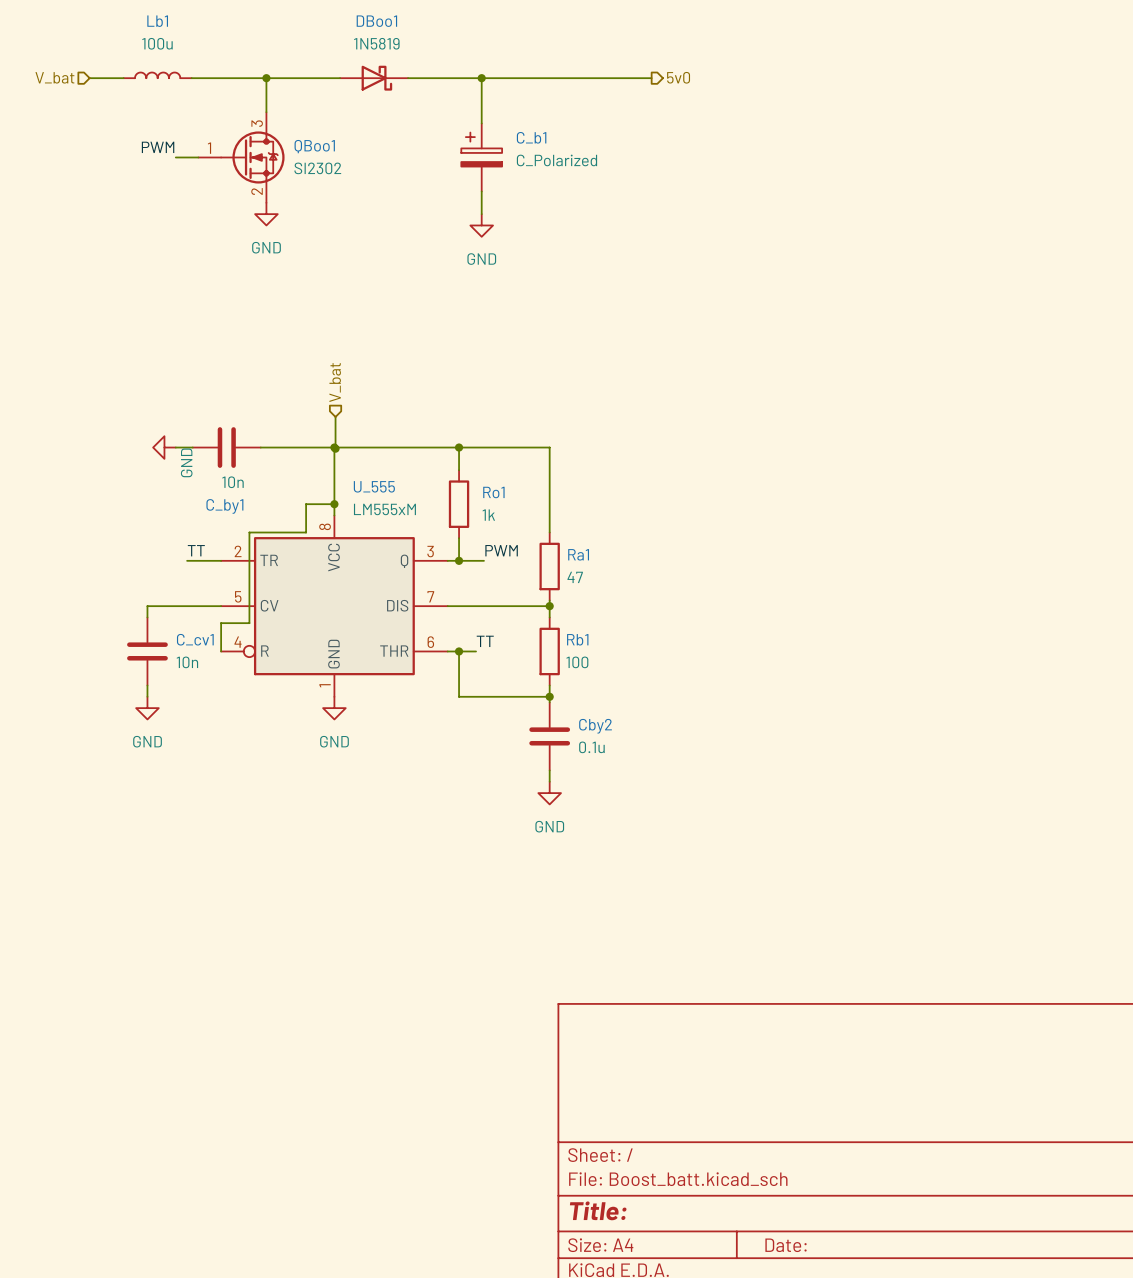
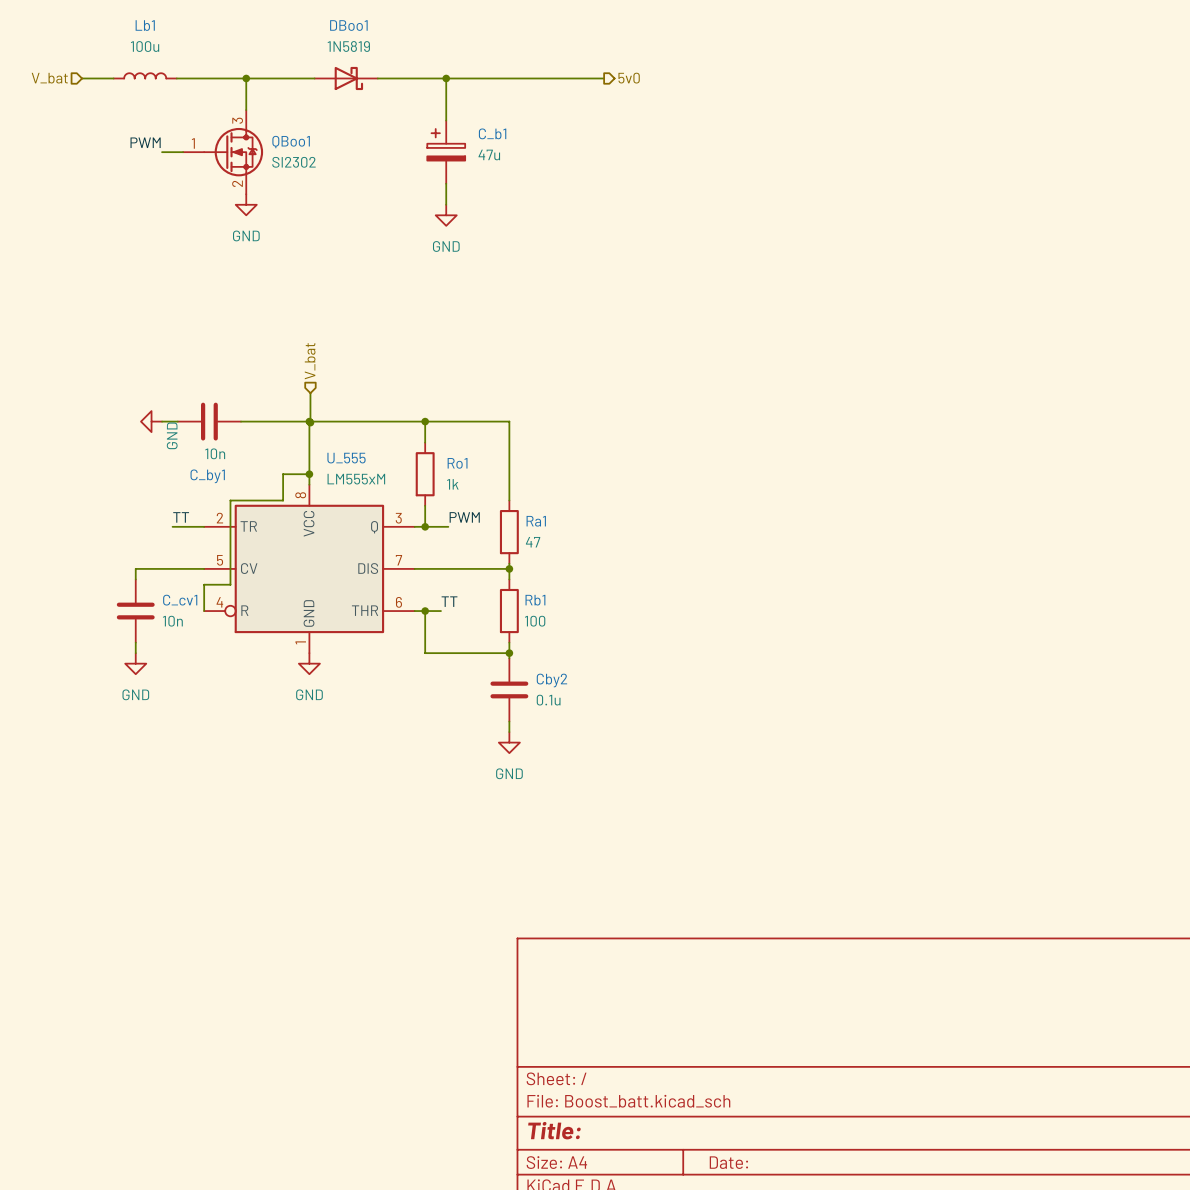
C_b1 value: C_Polarized (556, 160) -> 47u (489, 154)

